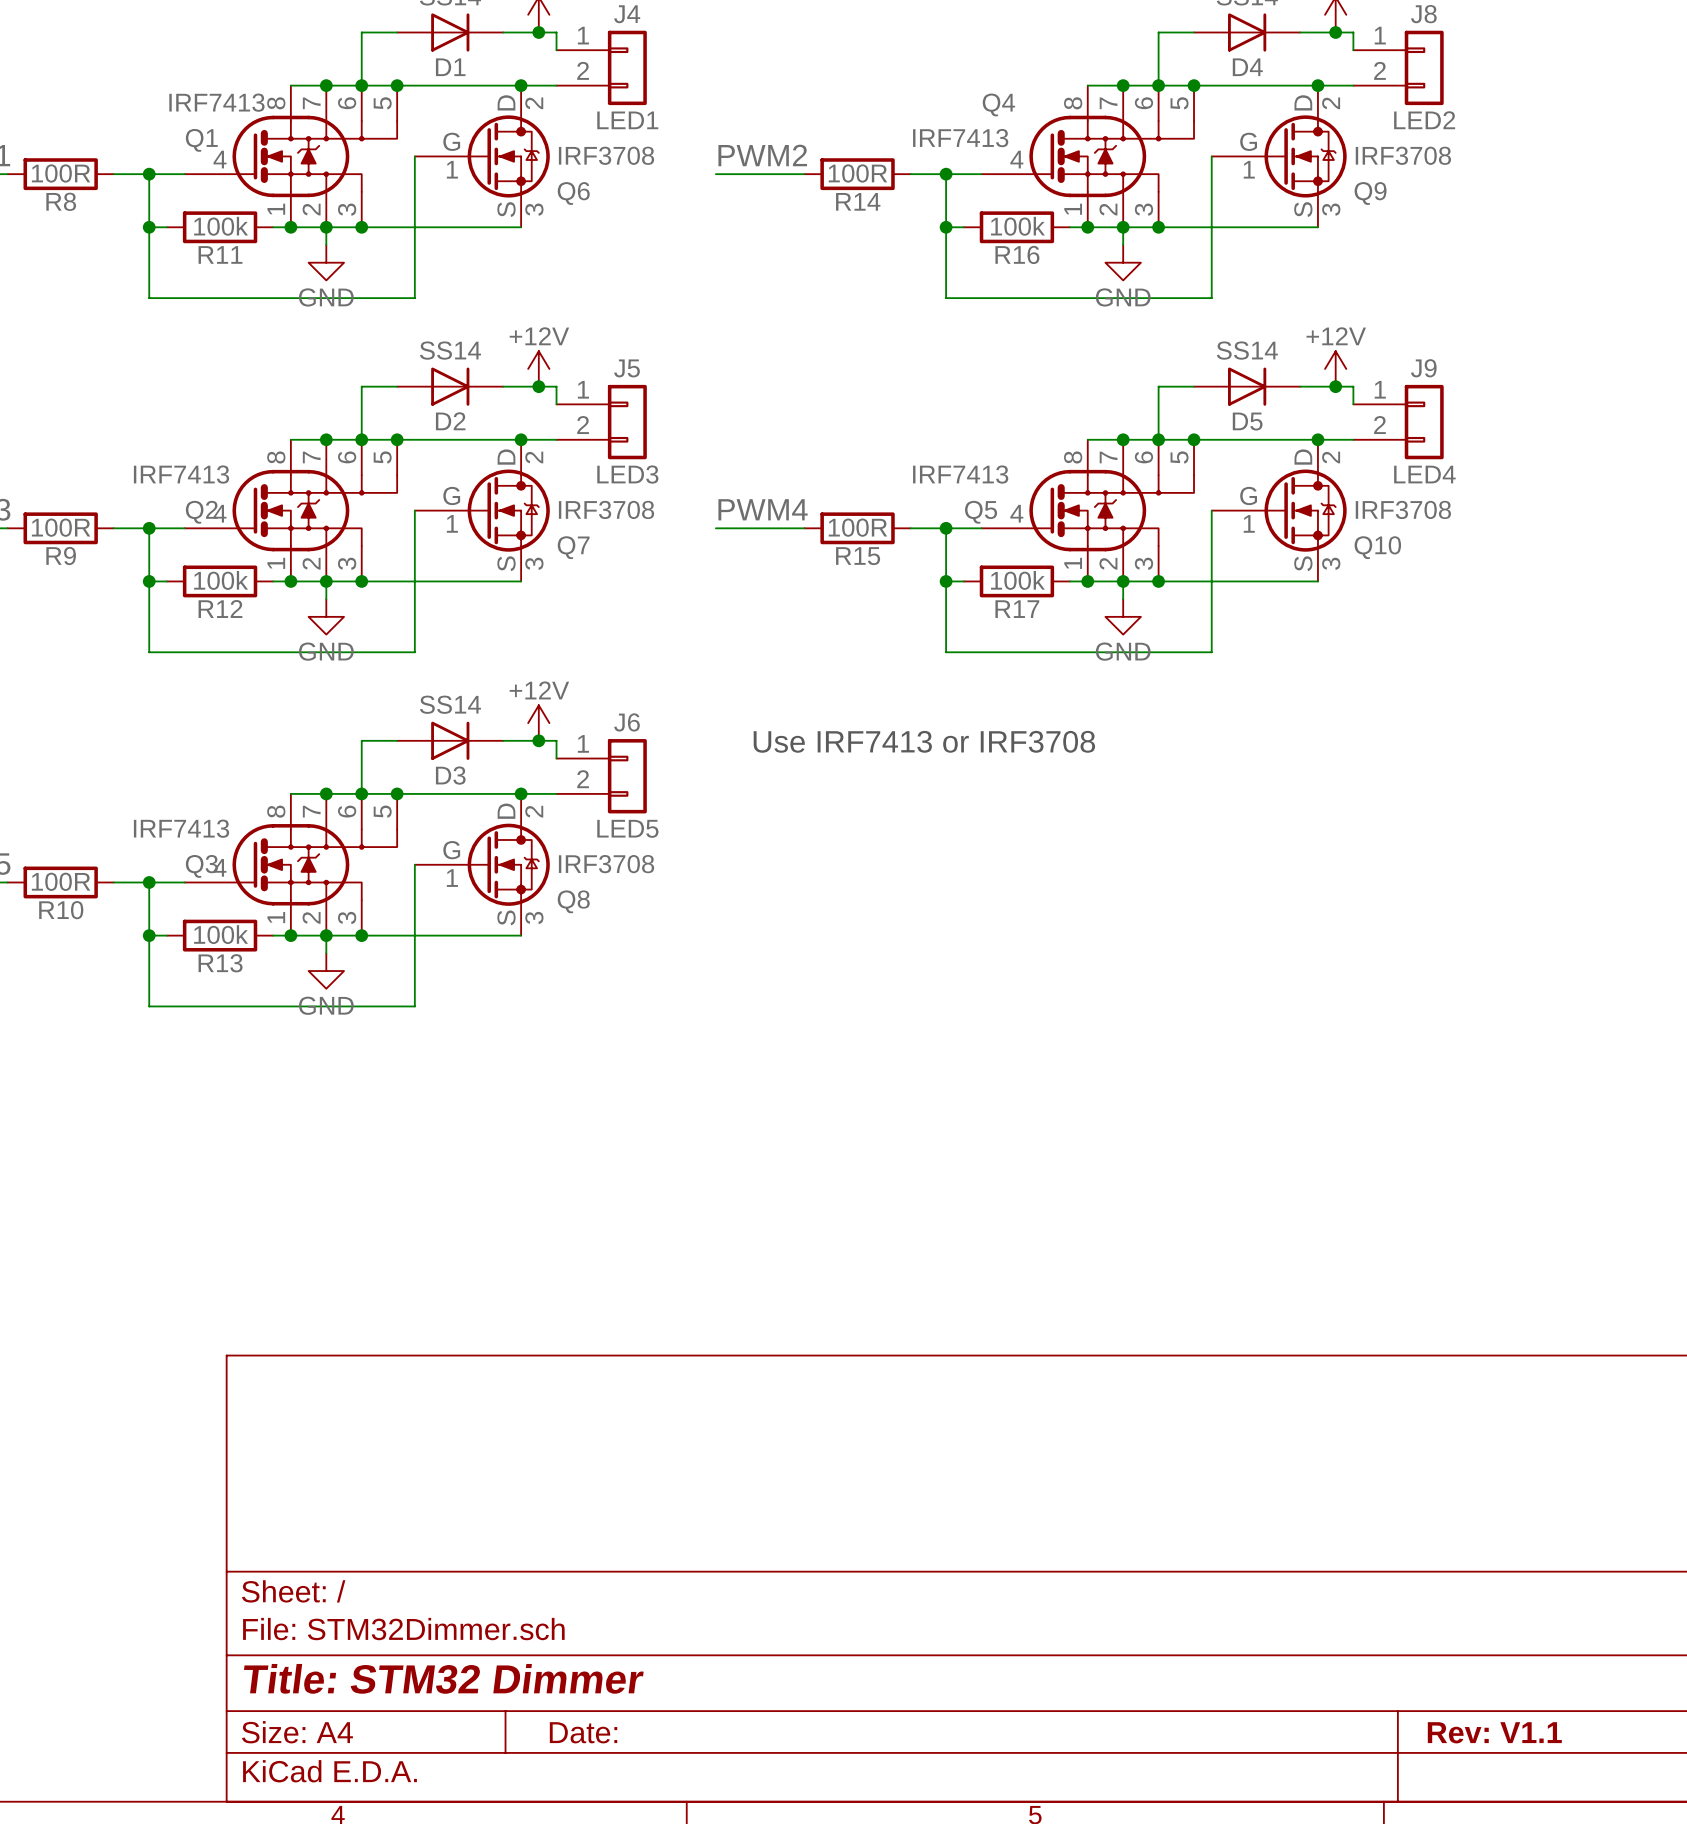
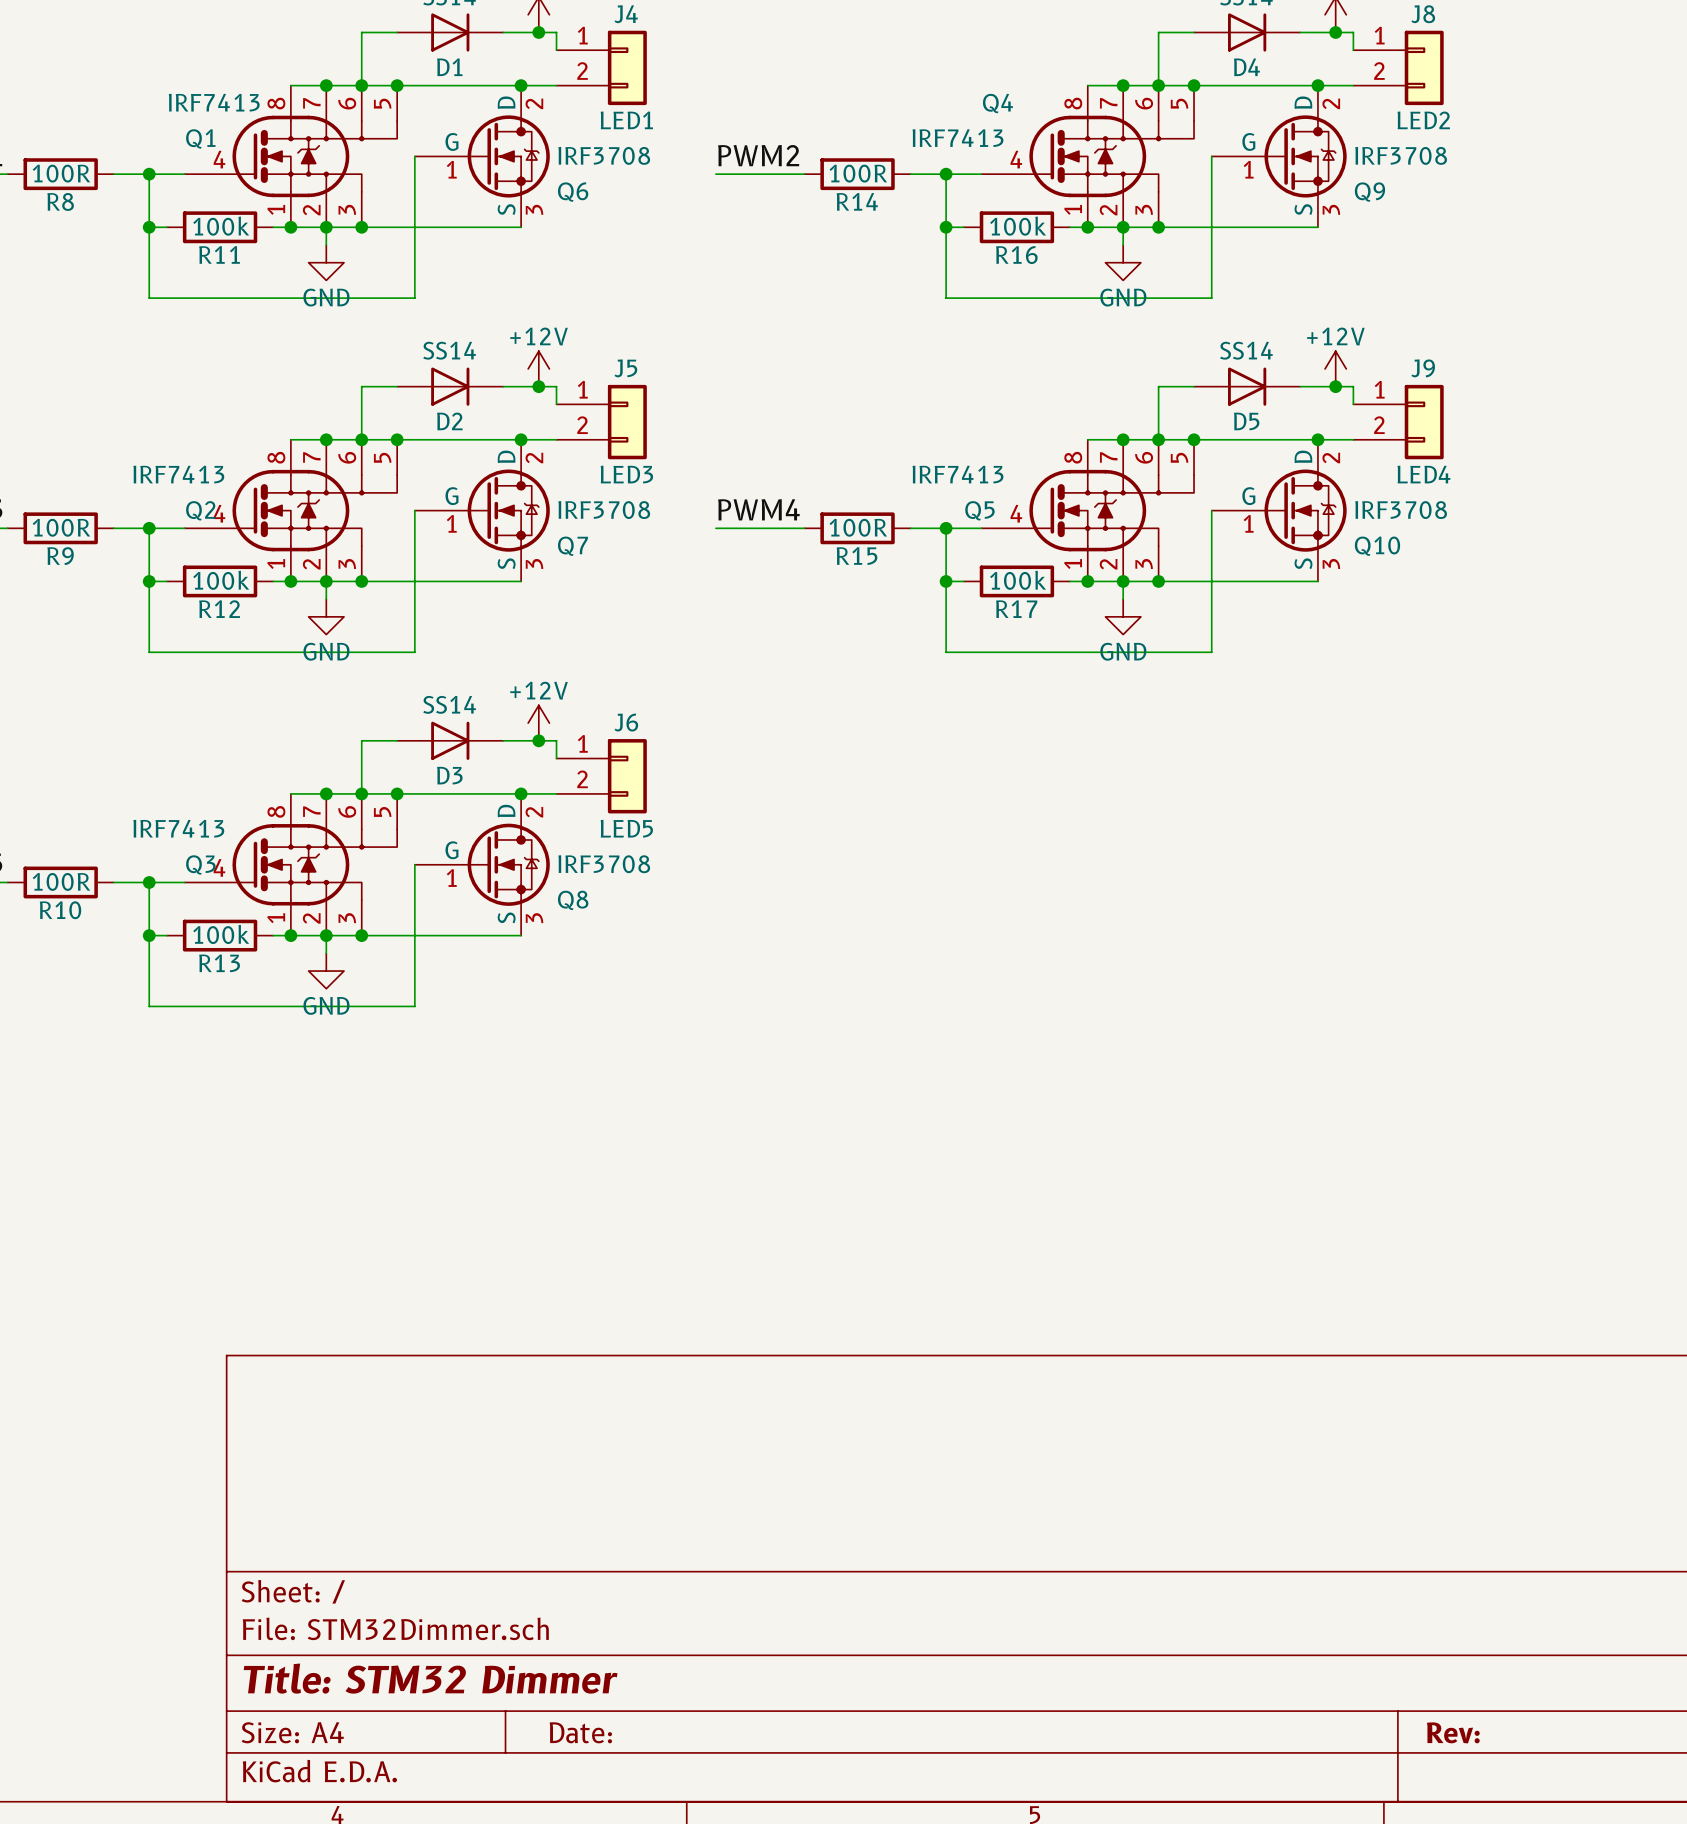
text: Use IRF7413 or IRF3708 (924, 741) -> none
title block: Rev: V1.1 (1494, 1732) -> Rev: (1453, 1732)

